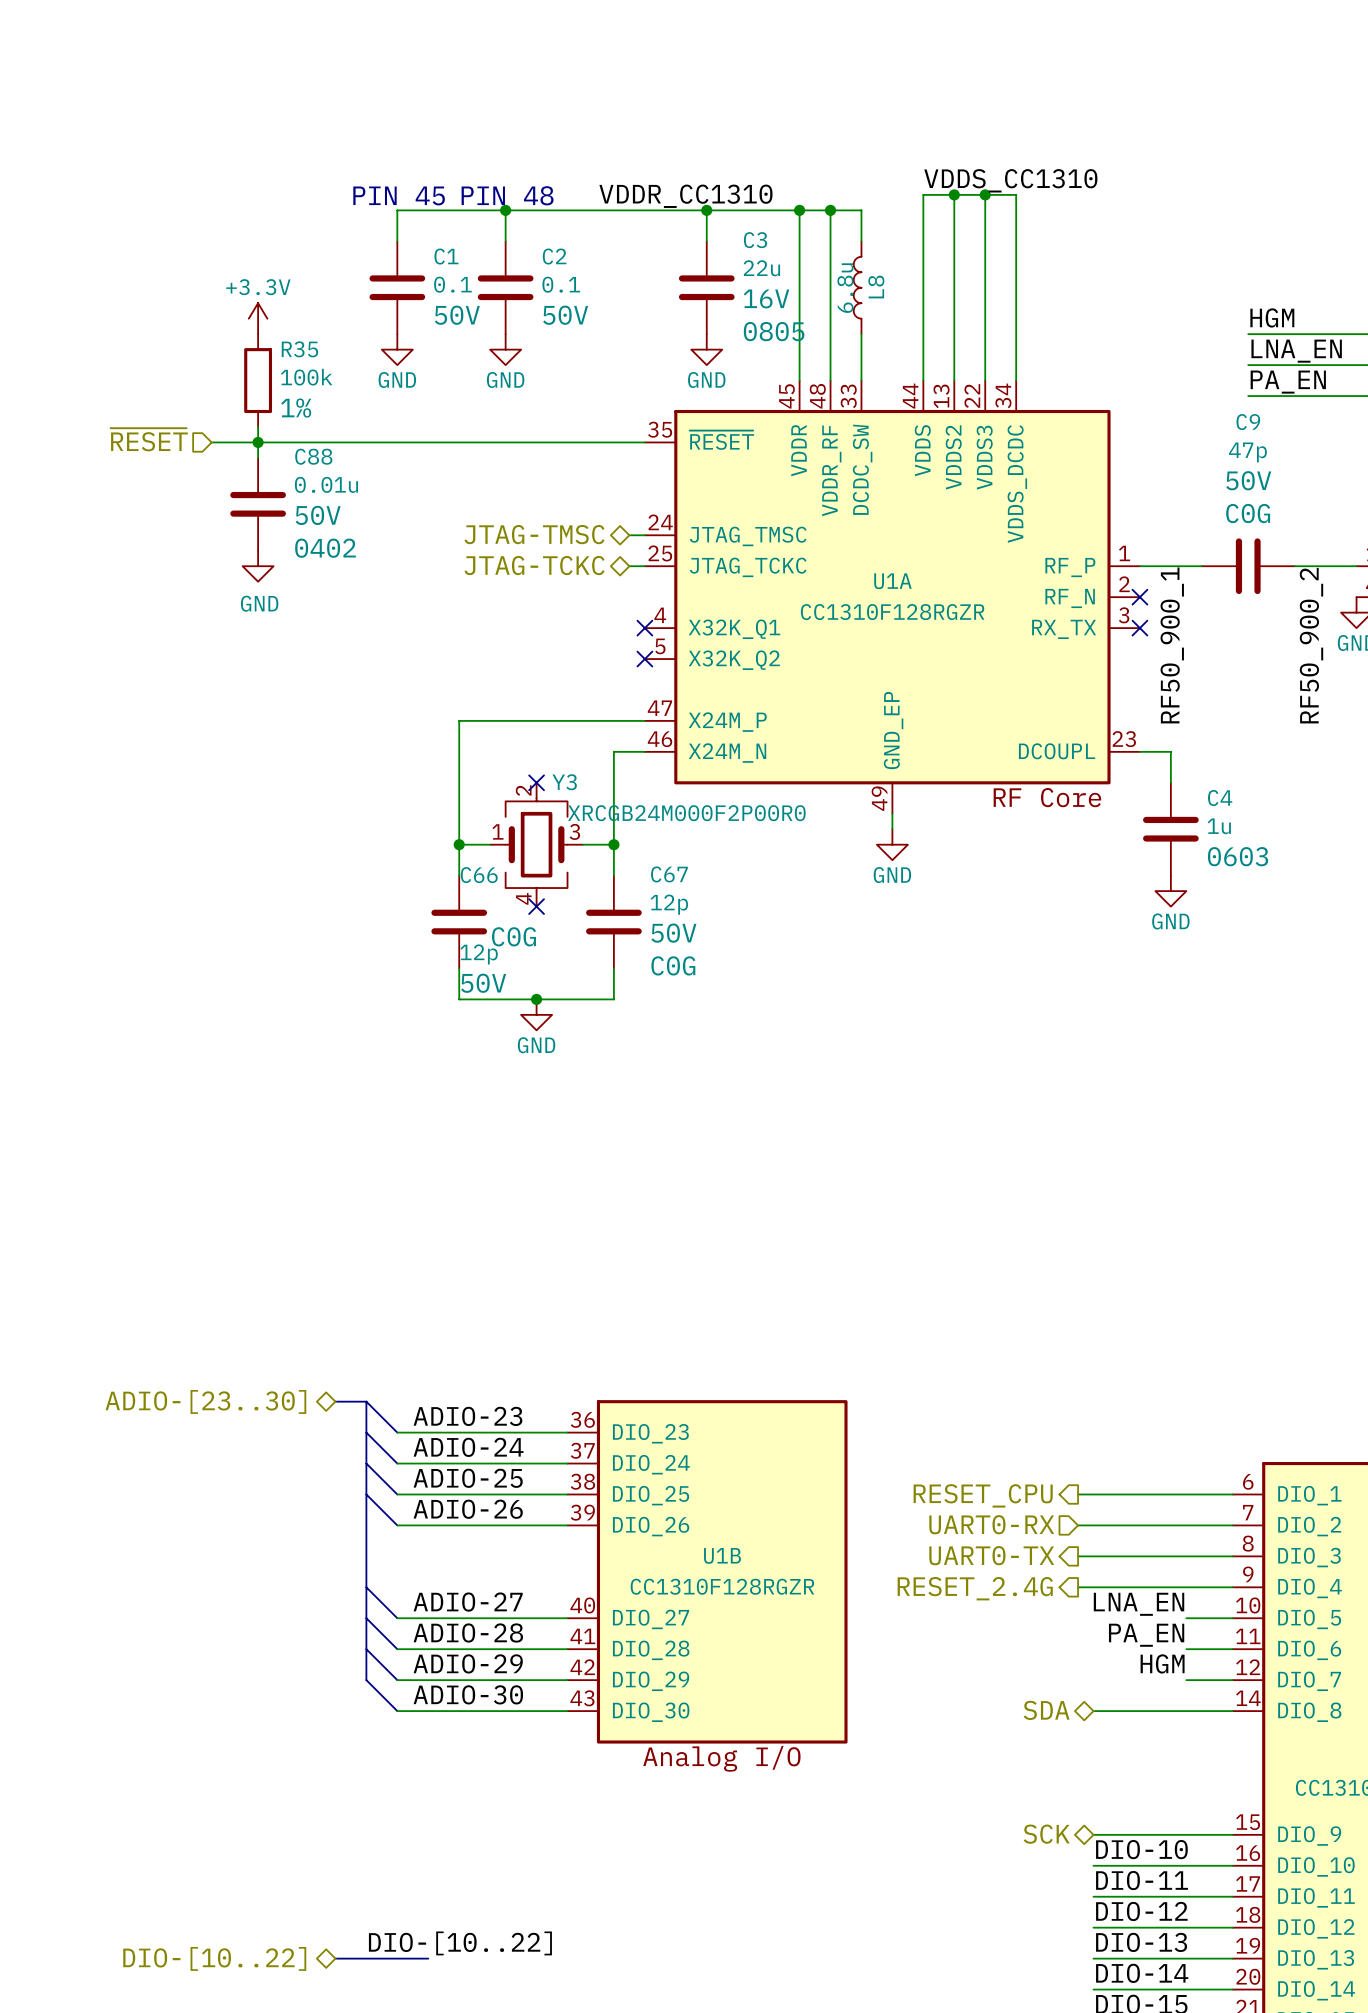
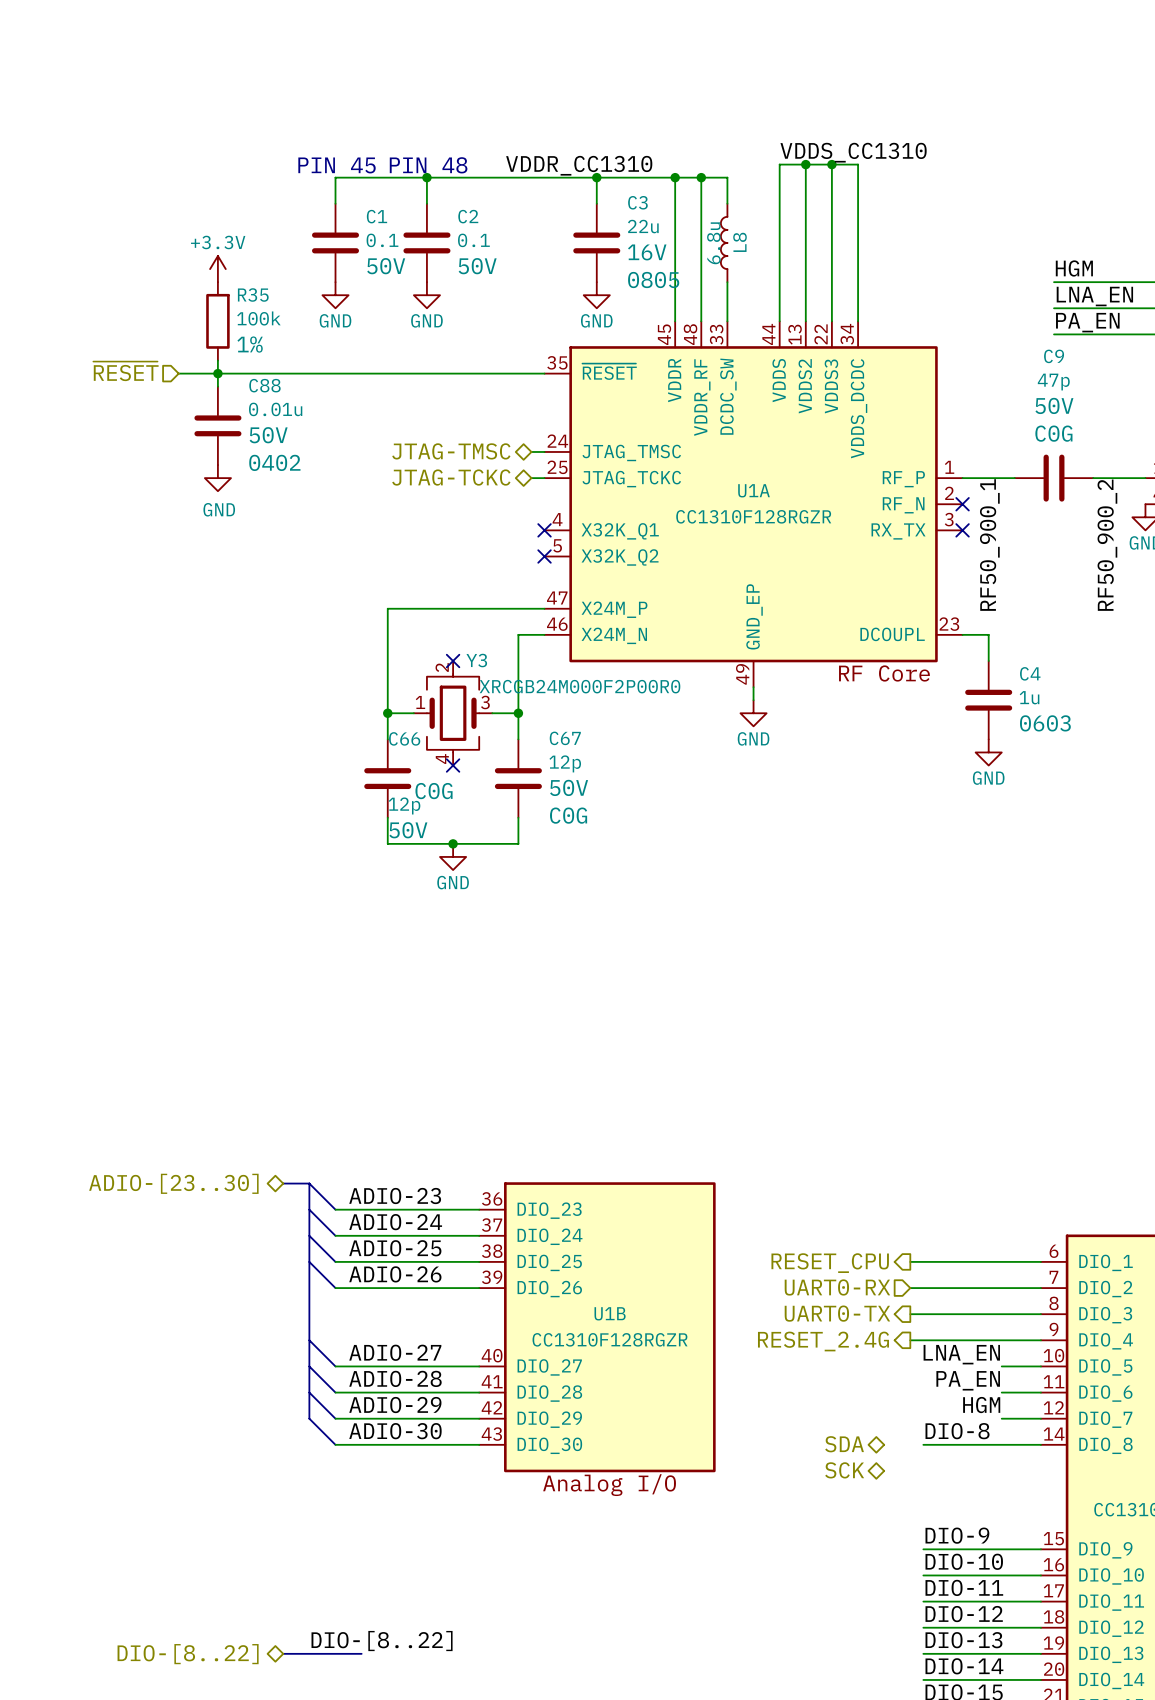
label: none -> DIO-8 (957, 1431)
hierarchical label position: SDA (1046, 1710) -> SDA (844, 1444)
label: none -> DIO-9 (957, 1535)
hierarchical label position: SCK (1046, 1834) -> SCK (844, 1470)
label: DIO-[10..22] (460, 1943) -> DIO-[8..22] (382, 1641)
hierarchical label: DIO-[10..22] (214, 1958) -> DIO-[8..22] (188, 1654)

